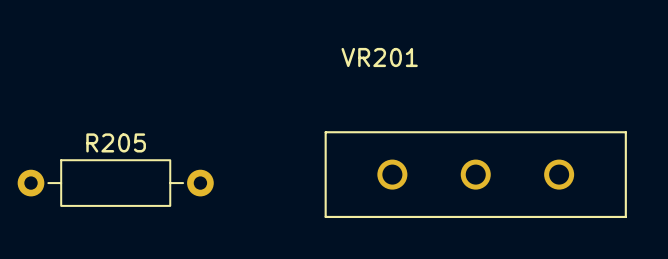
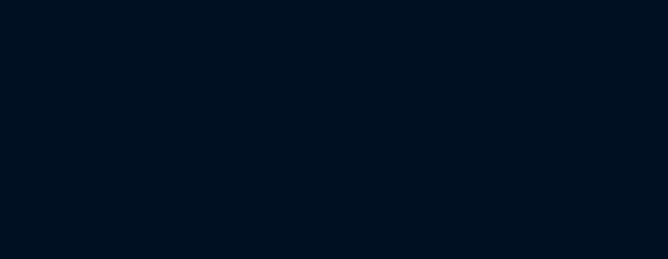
VR201: (475, 174) -> none
R205: (115, 183) -> none

